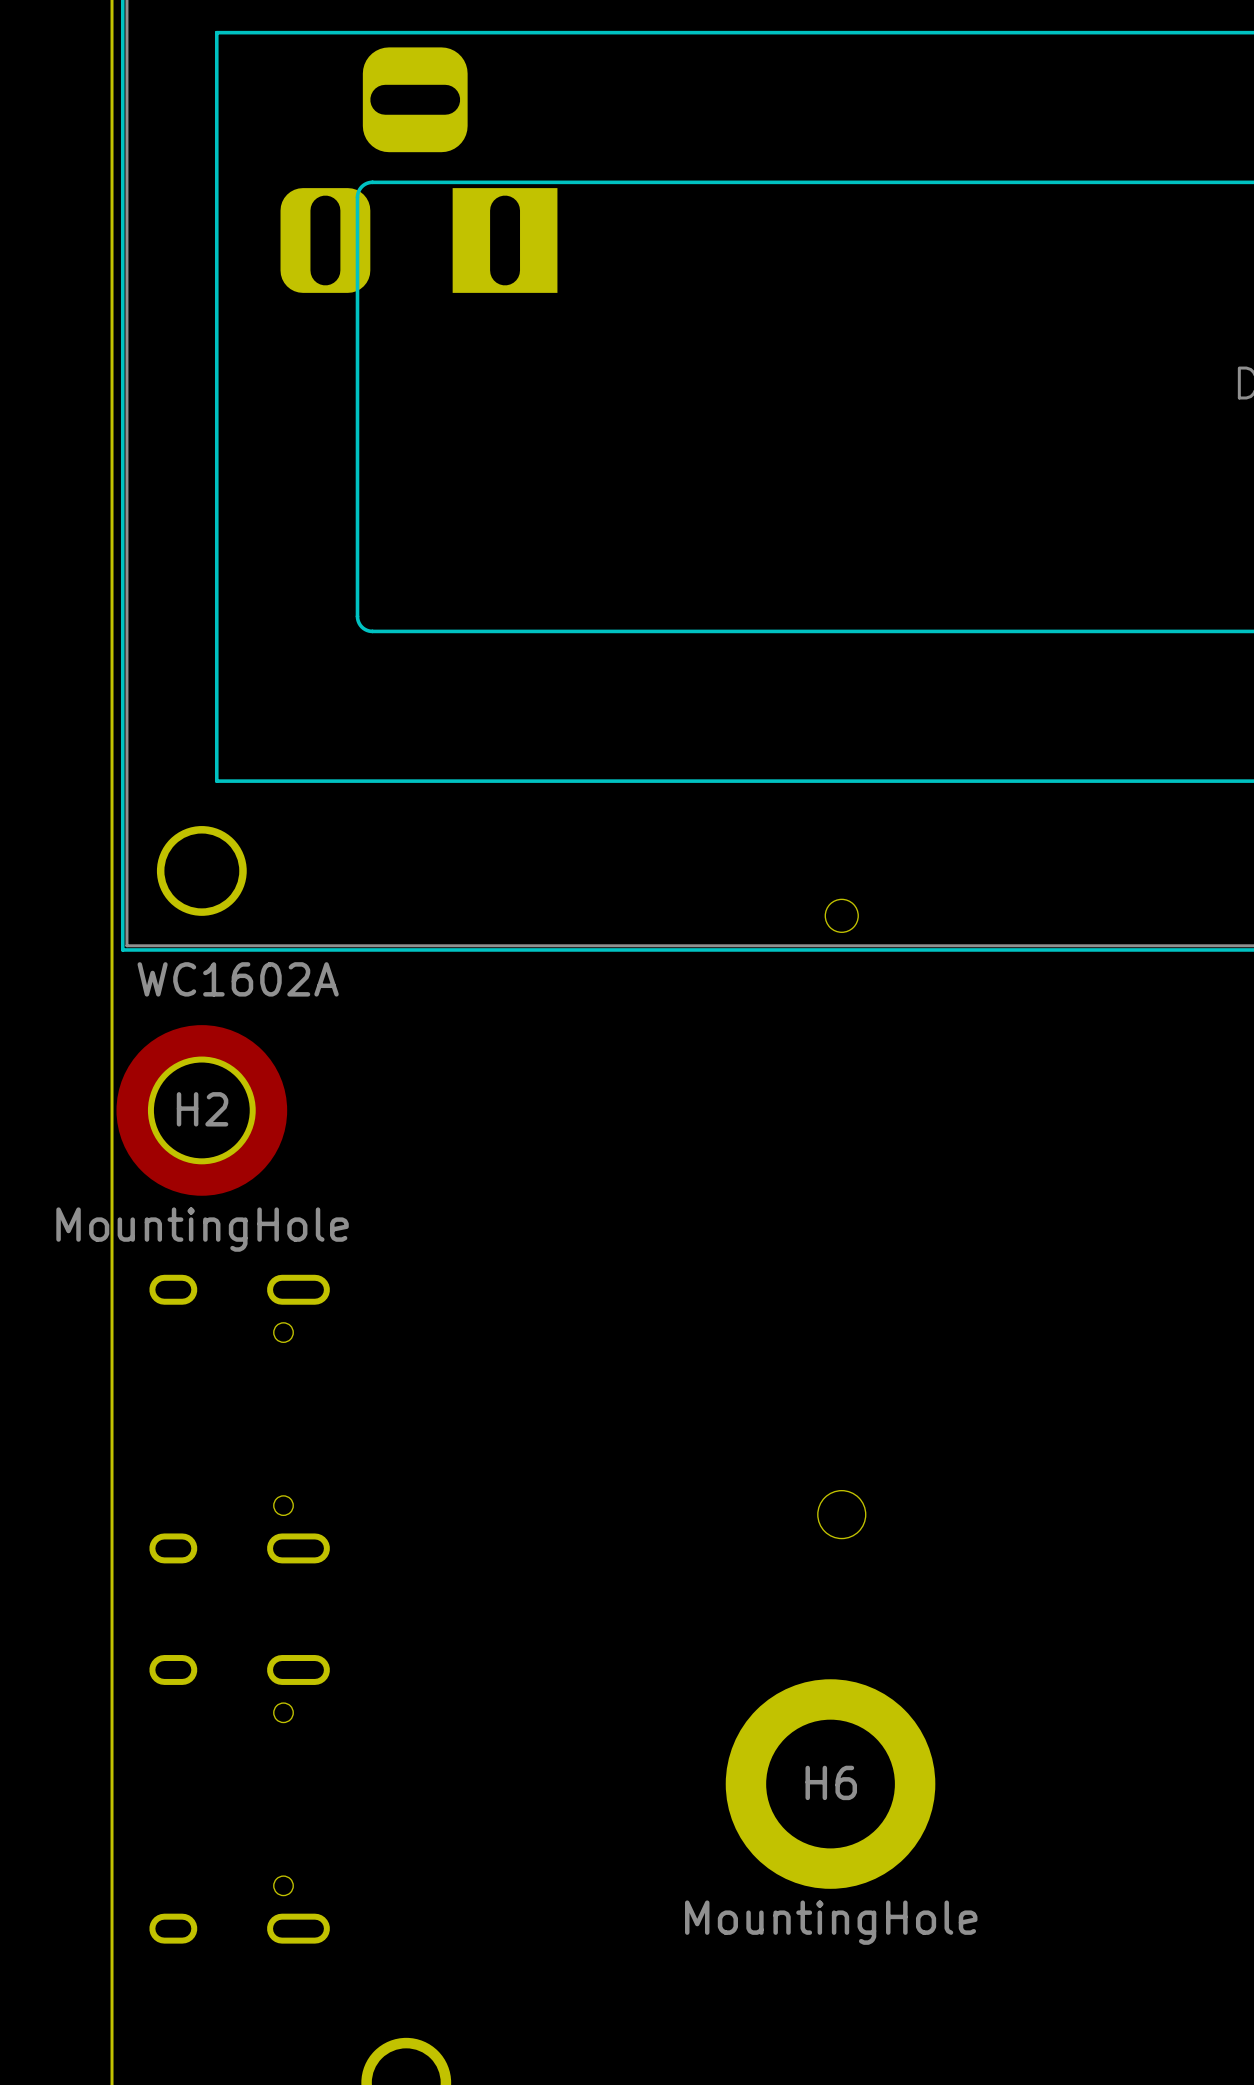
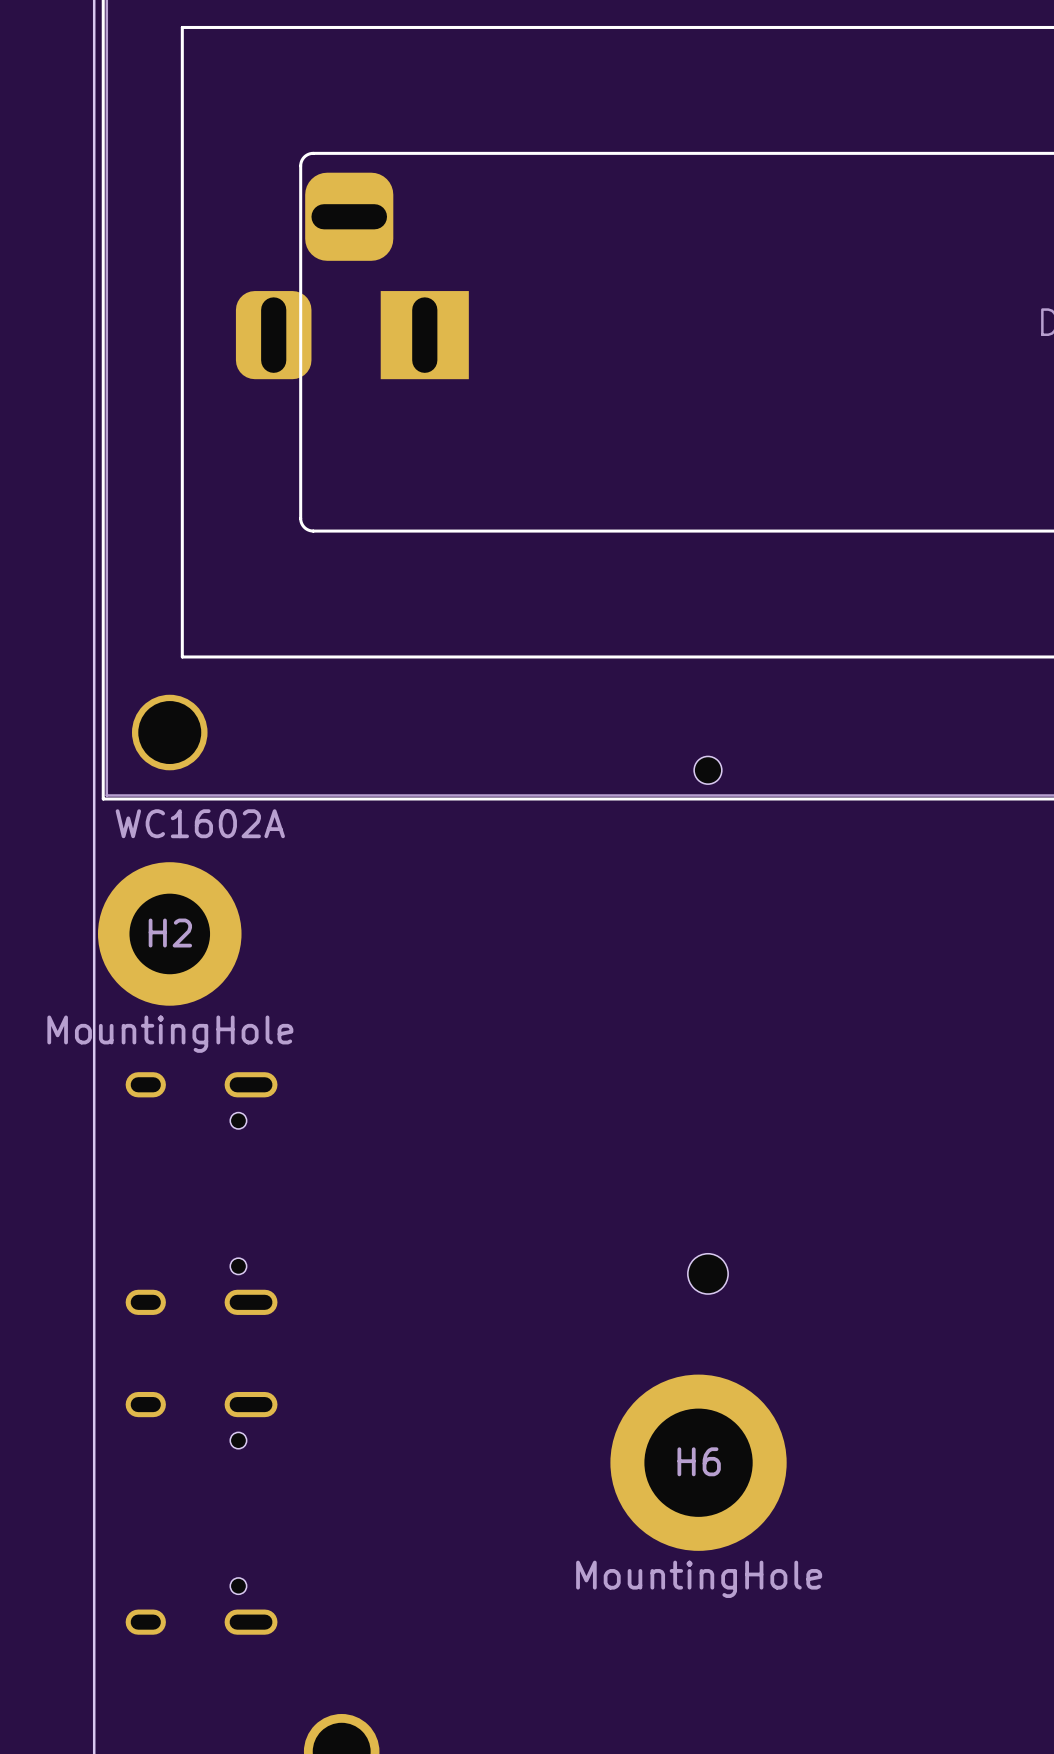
part position: (418, 170) -> (352, 275)
H6 position: (830, 1784) -> (698, 1462)

